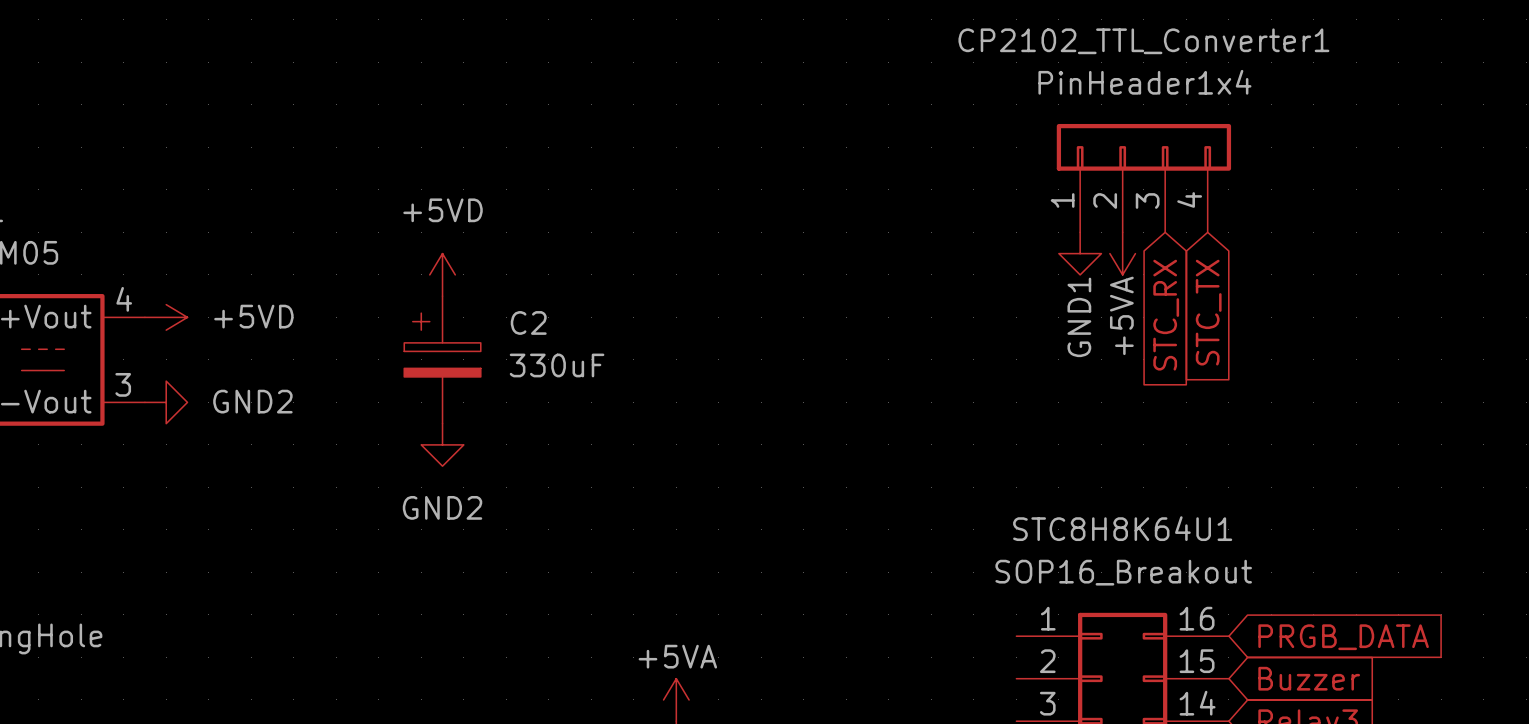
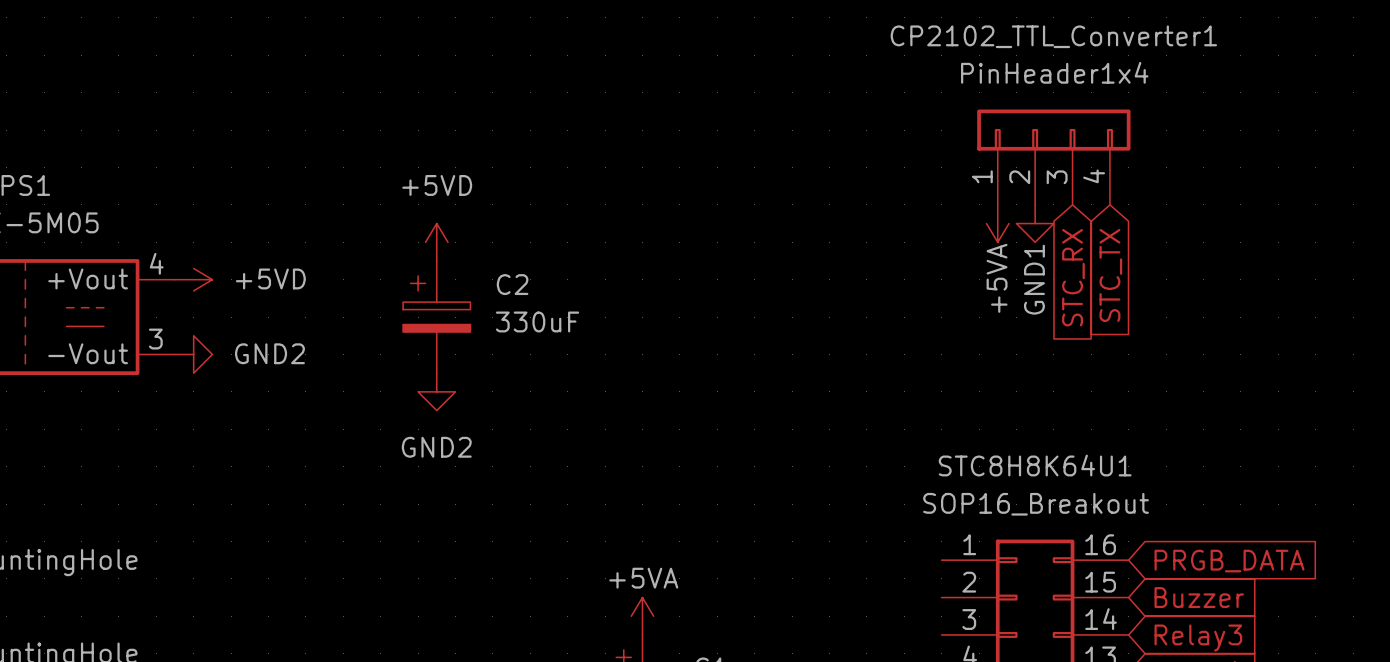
power symbol: GND1 (1080, 253) -> +5VA (997, 223)
power symbol: +5VA (1122, 253) -> GND1 (1035, 223)

